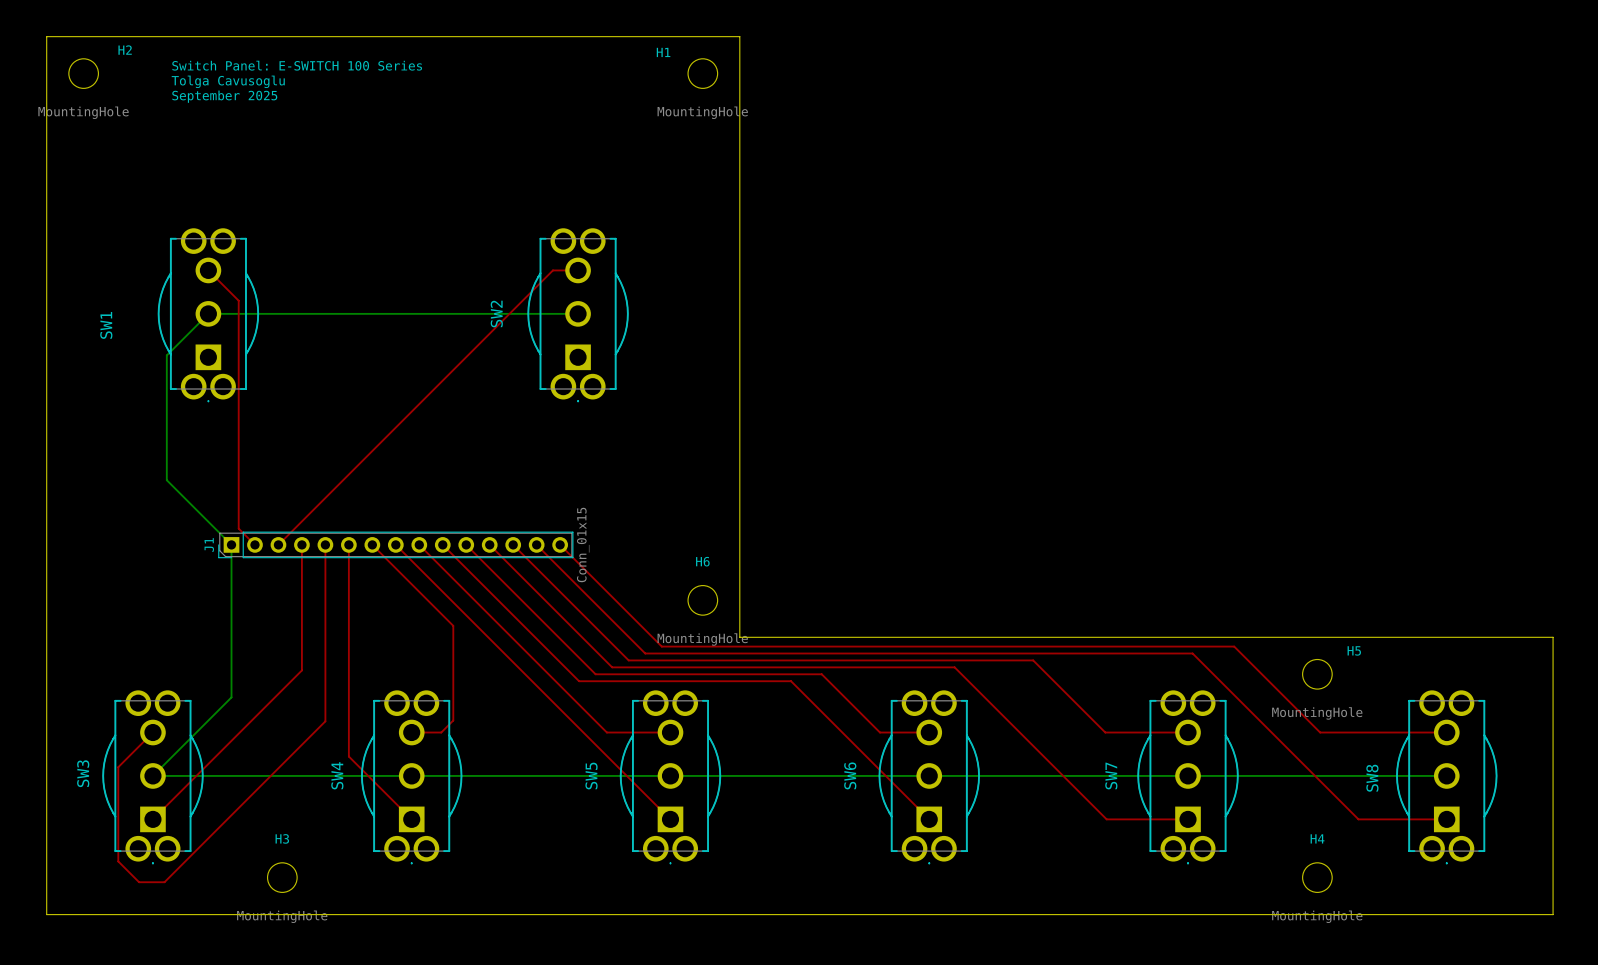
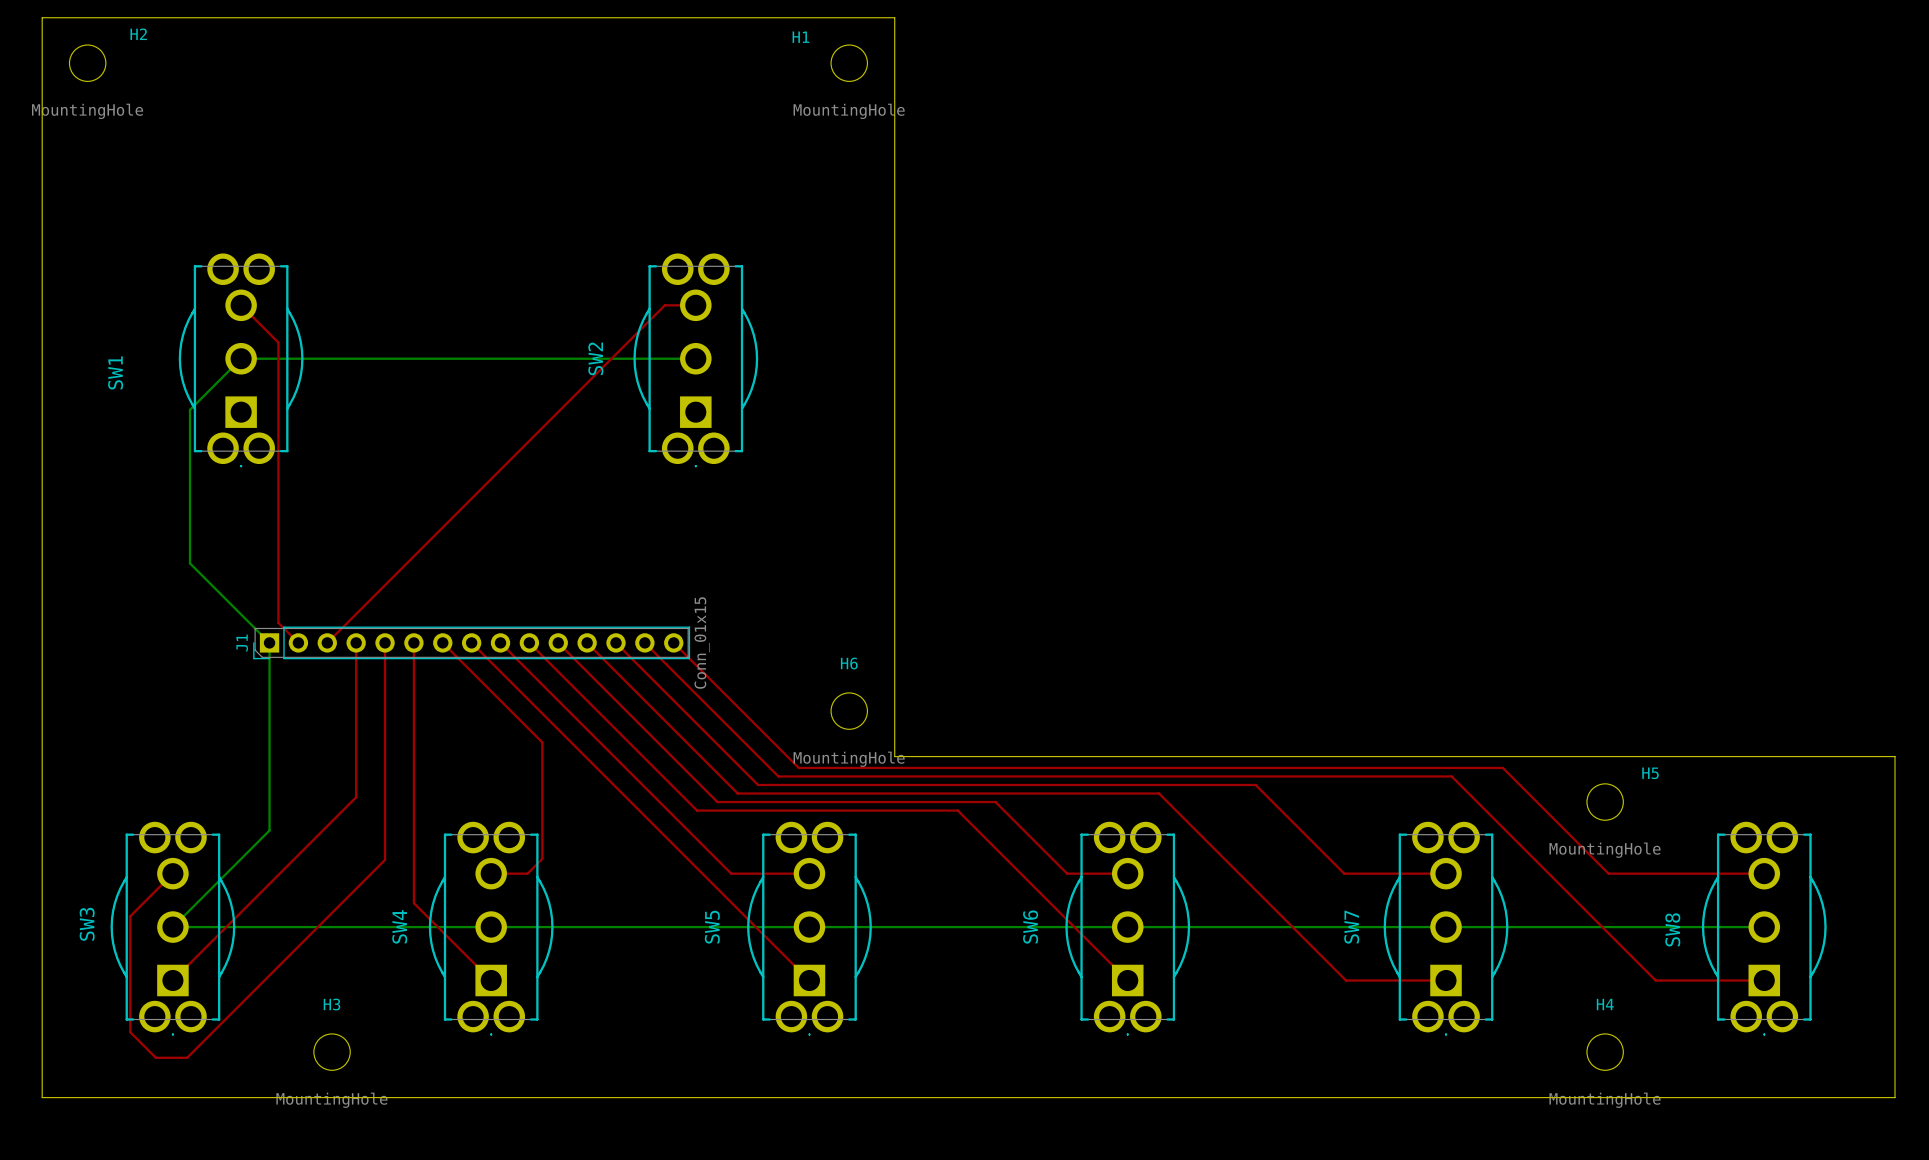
text: Switch Panel: E-SWITCH 100 Series (297, 65) -> none
text: Tolga Cavusoglu (228, 81) -> none
text: September 2025 (224, 96) -> none

